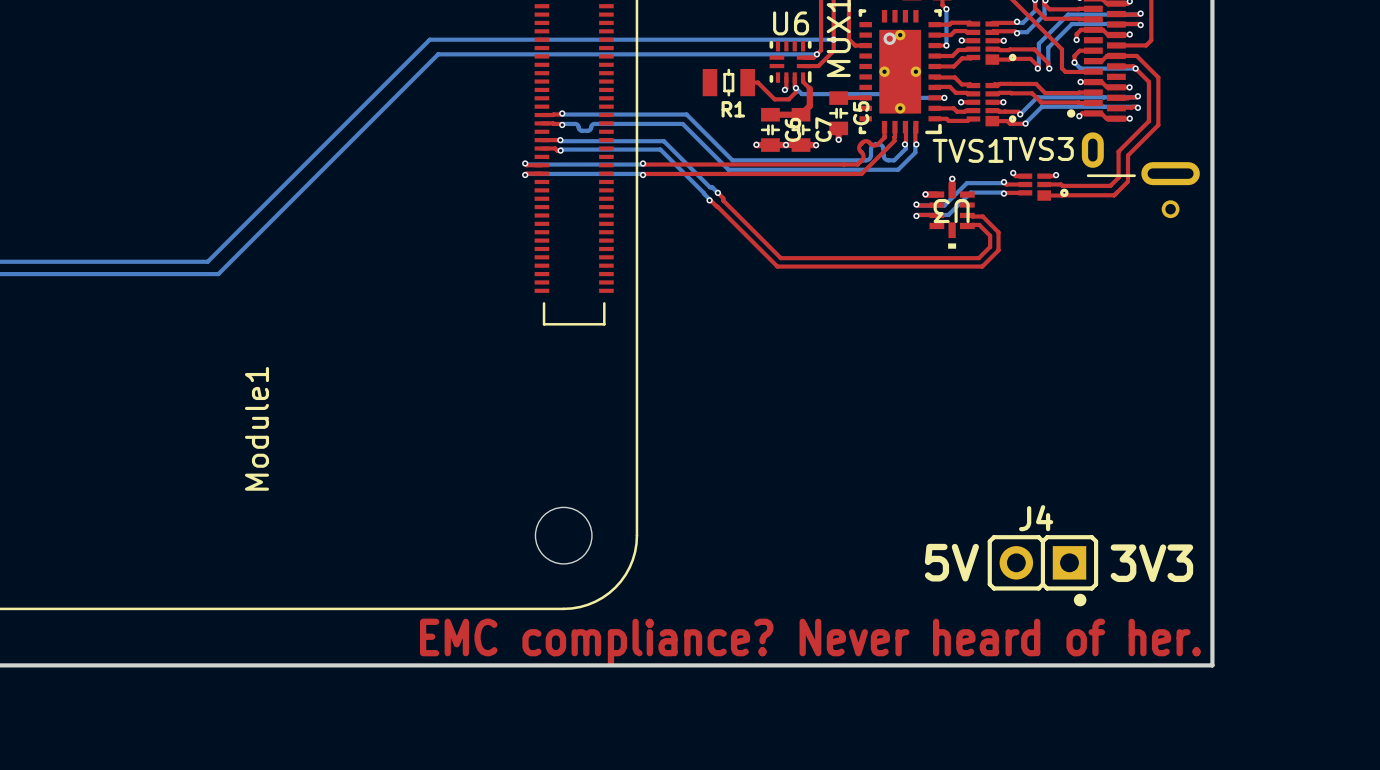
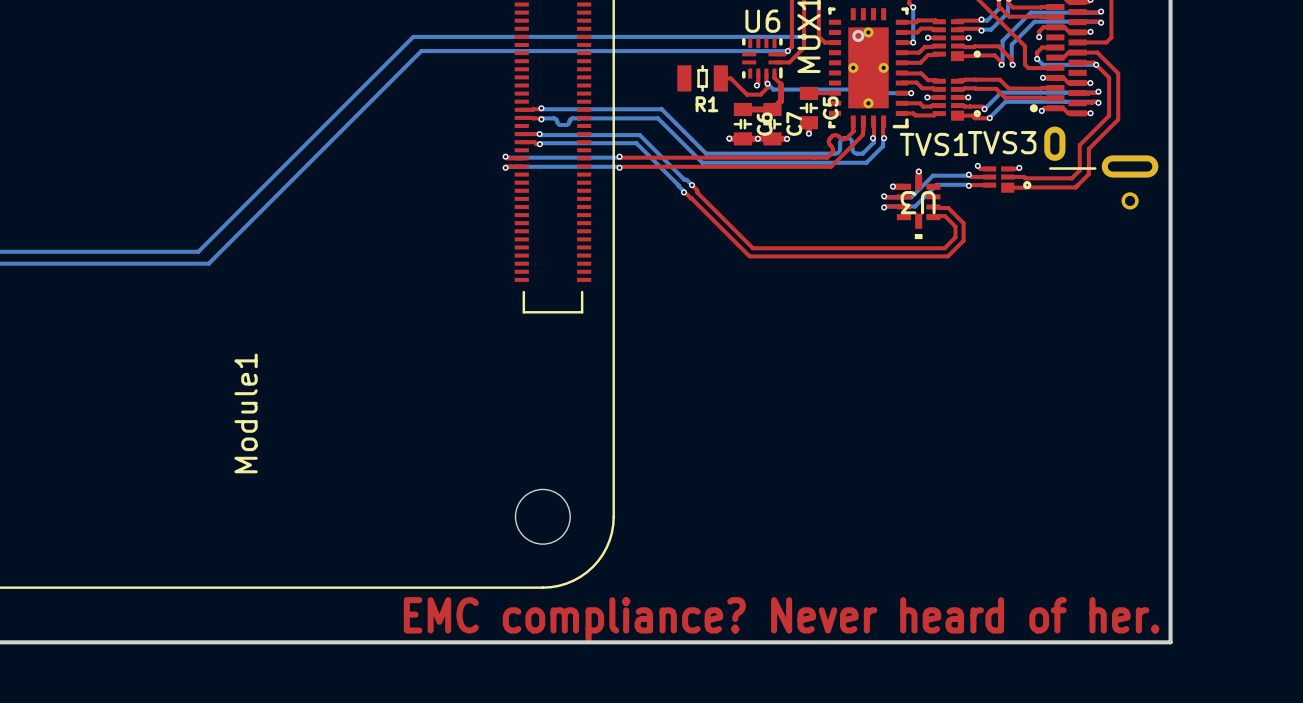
text: 5V (951, 562) -> none
text: 3V3 (1151, 563) -> none
J4: (1042, 570) -> none

